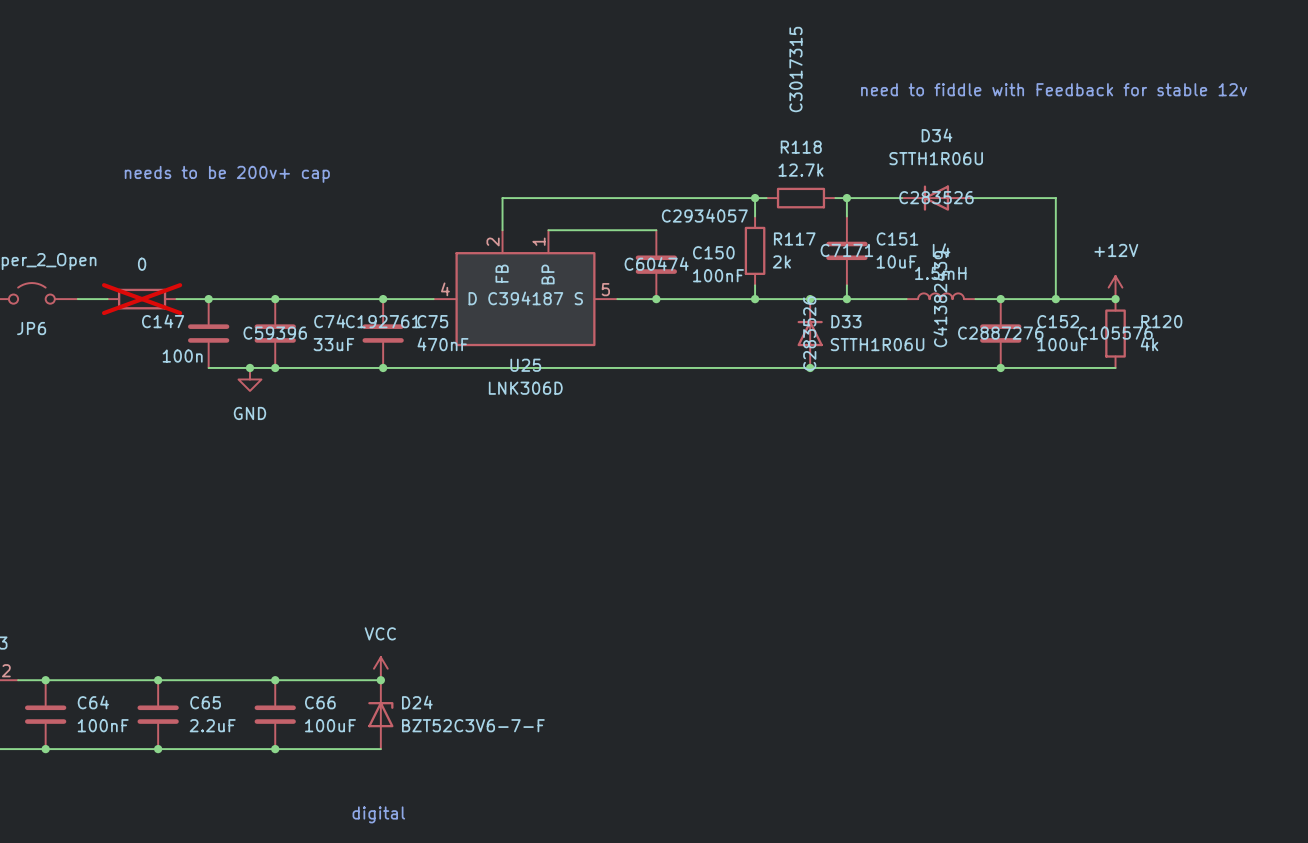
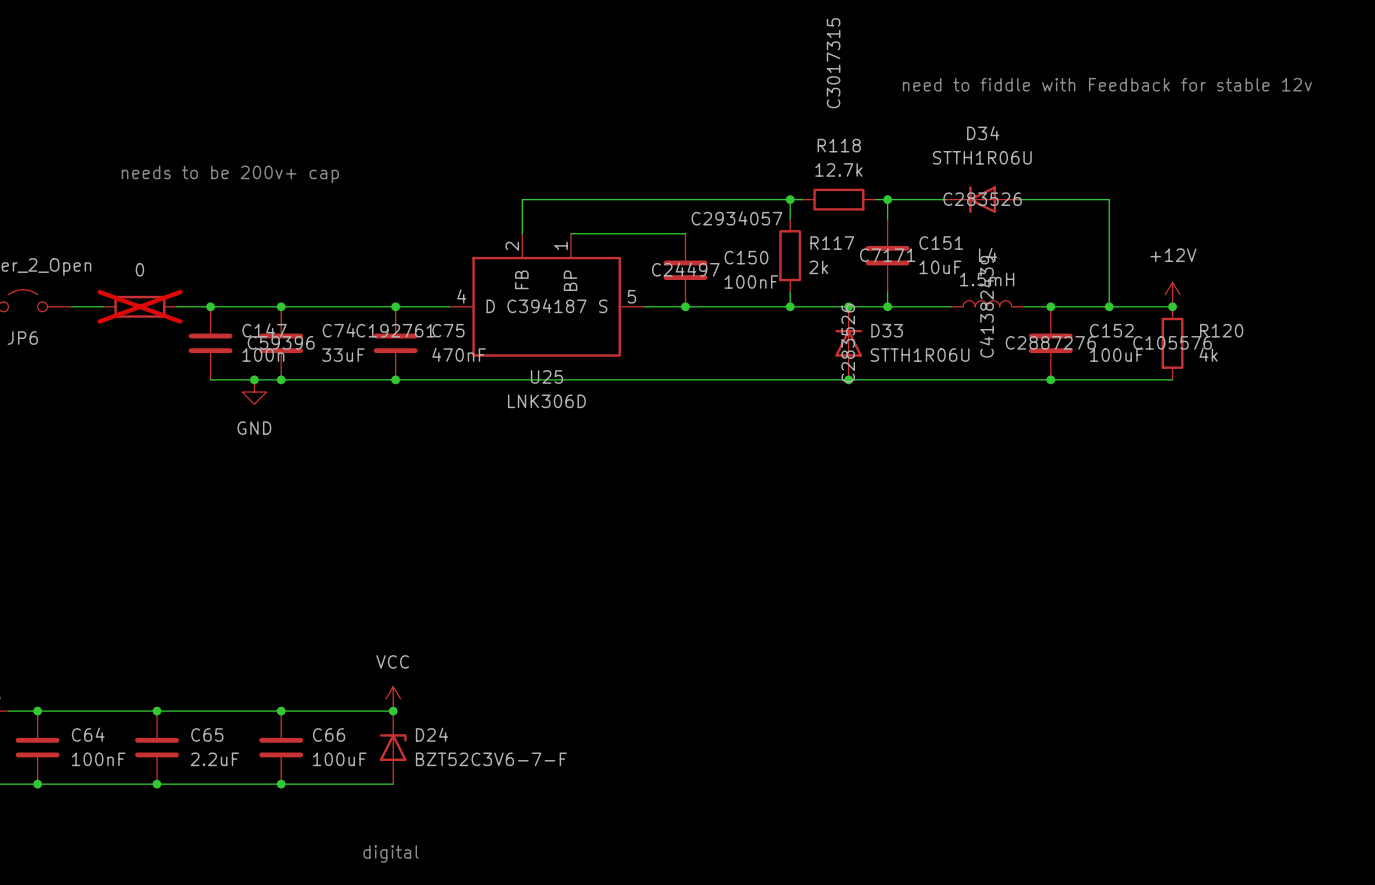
C150 text: C60474 (656, 263) -> C24497 (685, 269)
C147 name position: C147 (163, 321) -> C147 (264, 330)
C147 value position: 100n (182, 356) -> 100n (263, 355)

